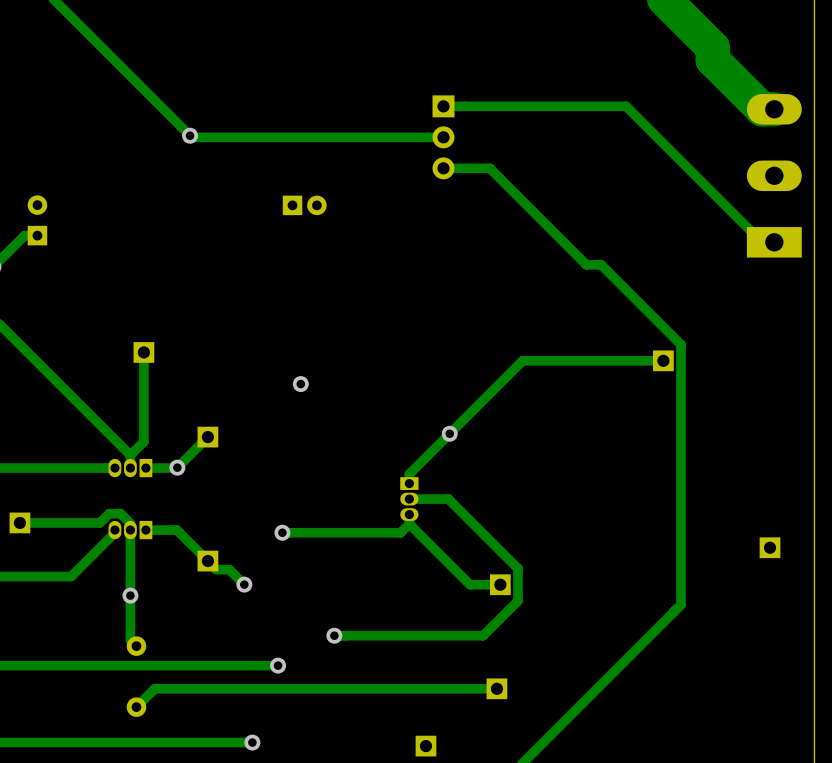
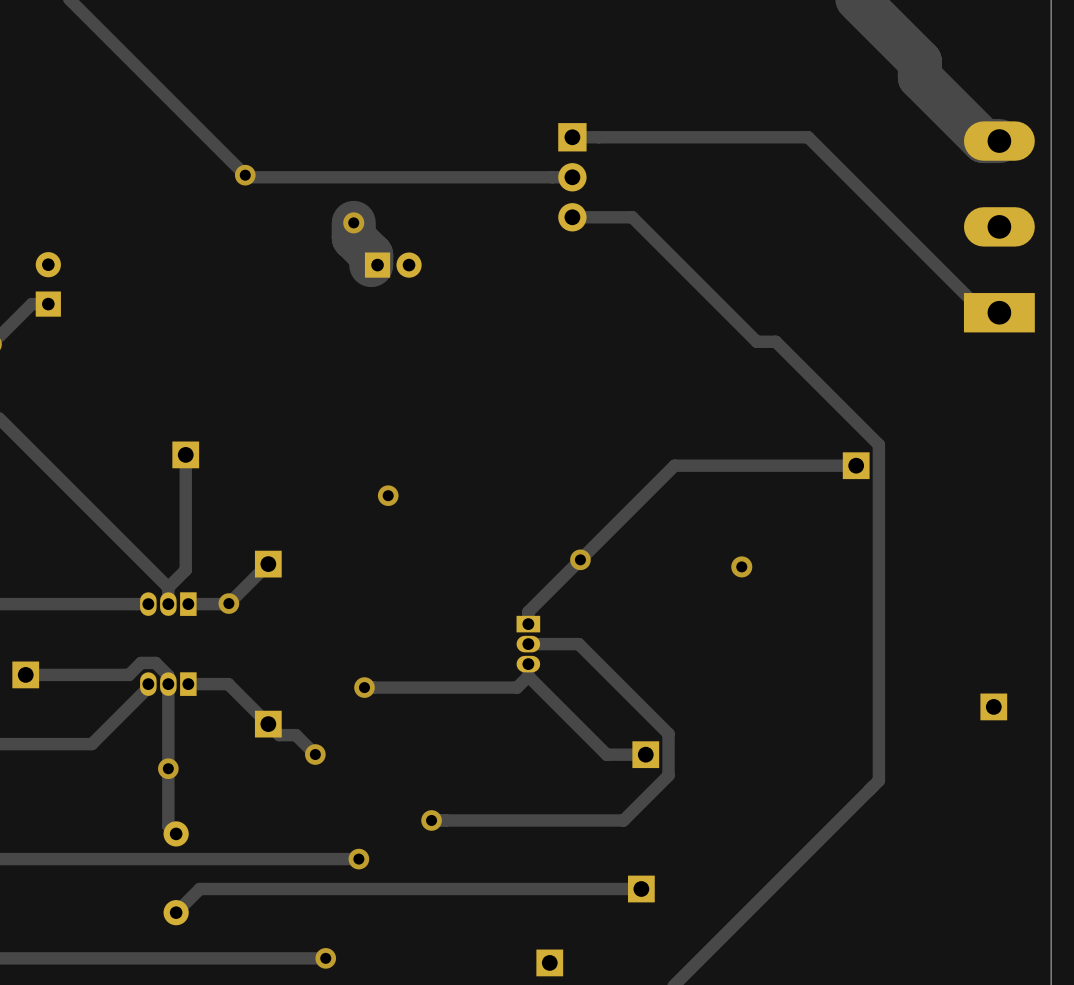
track: none -> (353, 222) (353, 237) (371, 255) (371, 265)
via: none -> (353, 222)
via: none -> (741, 566)

